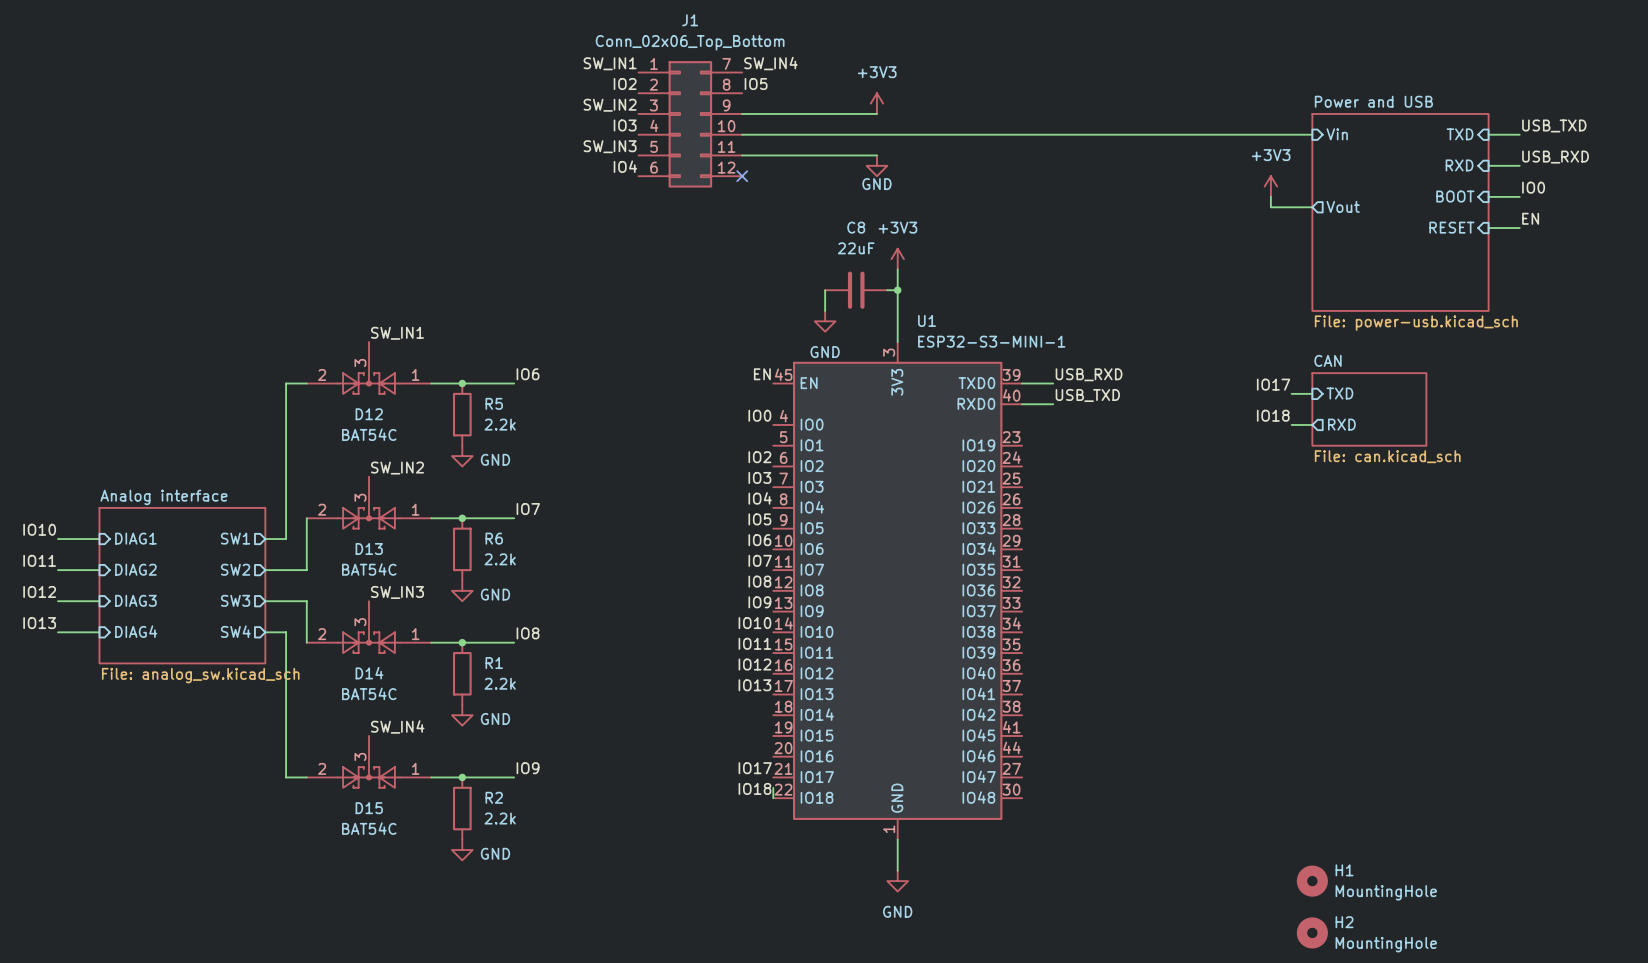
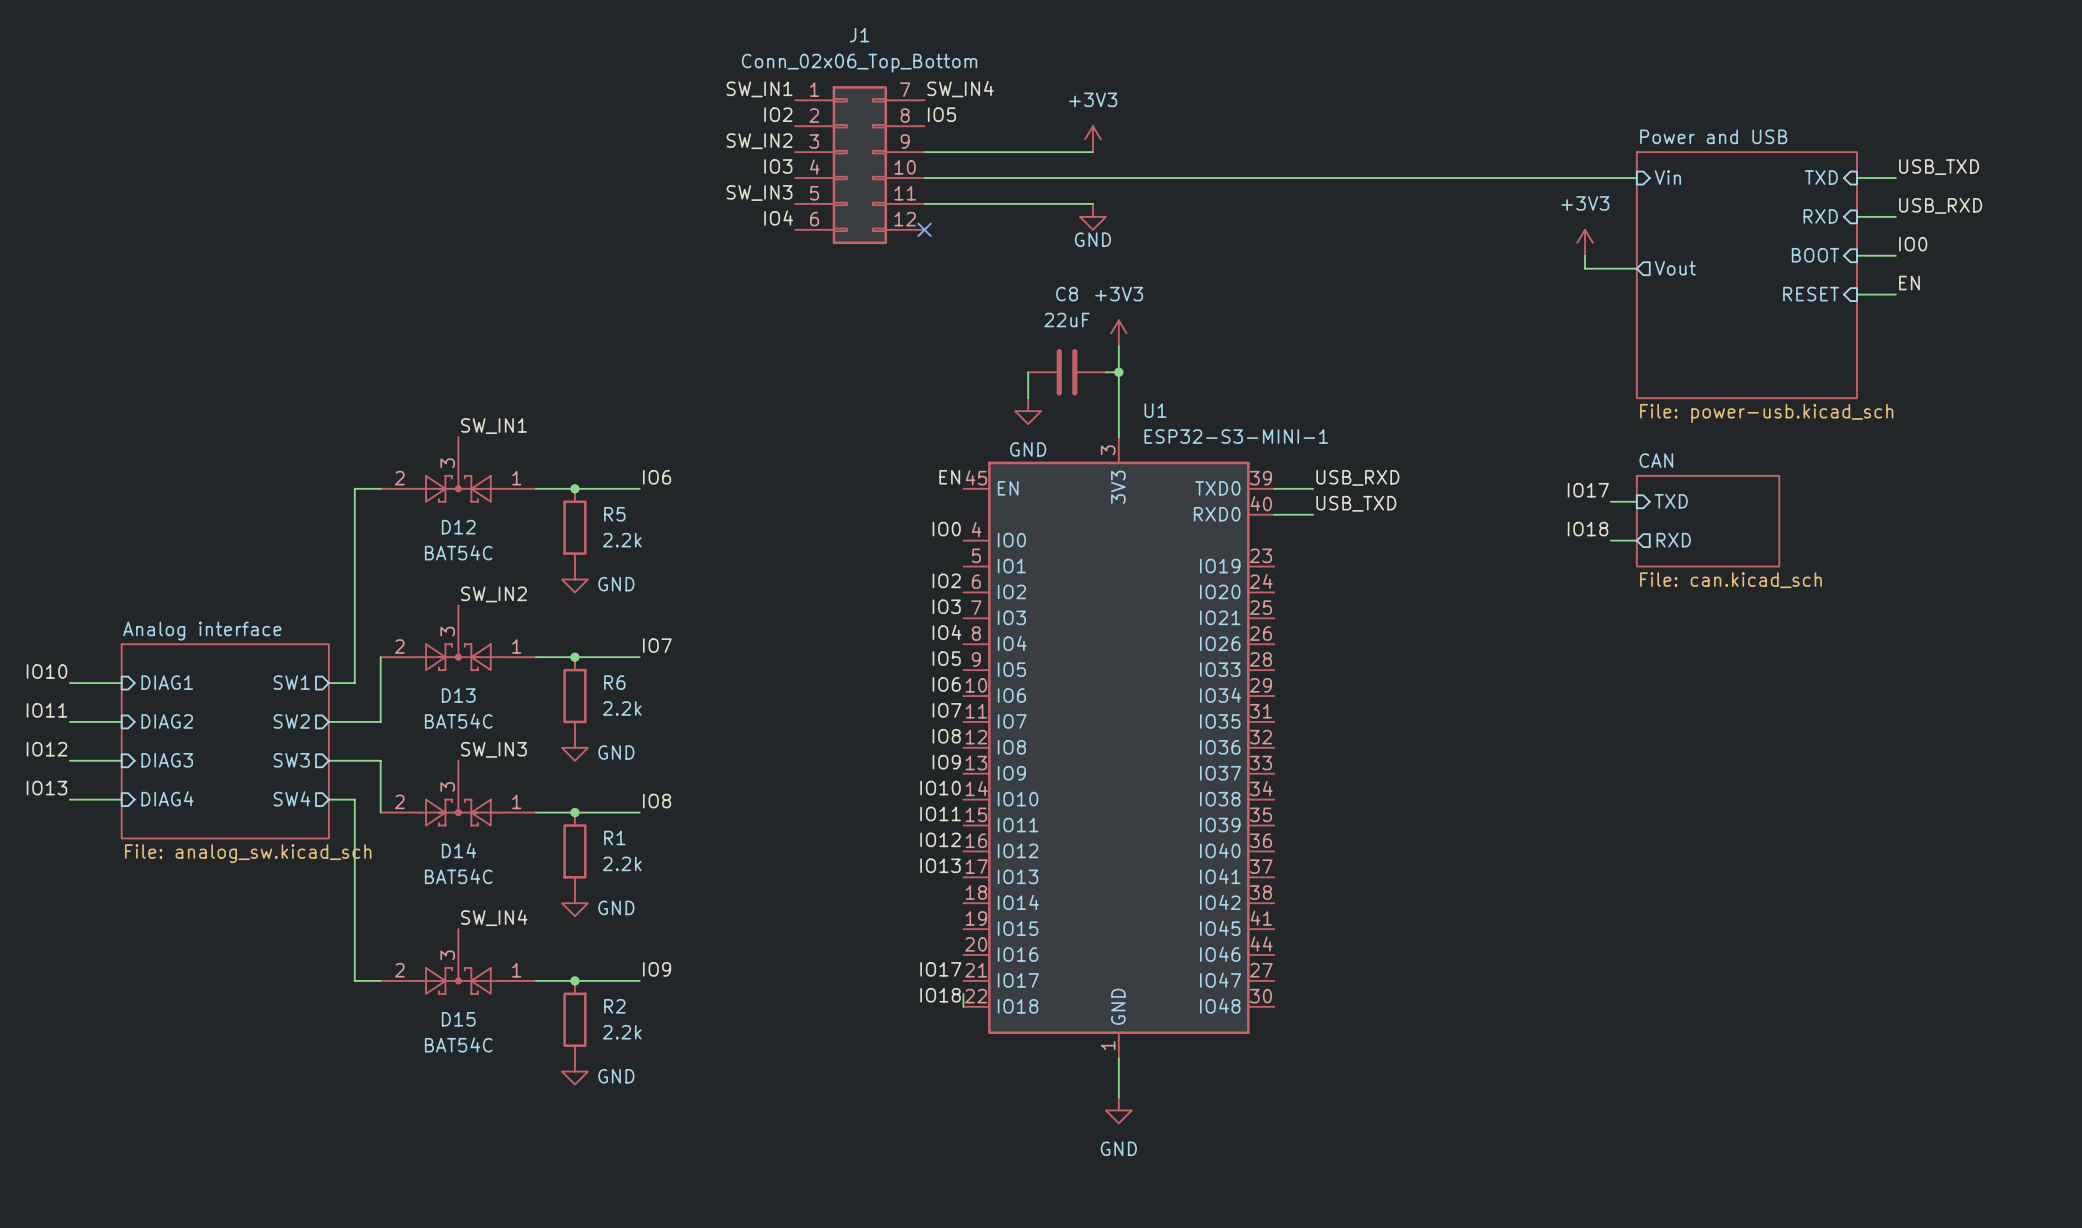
H1: MountingHole (1312, 881) -> none
H2: MountingHole (1312, 932) -> none

